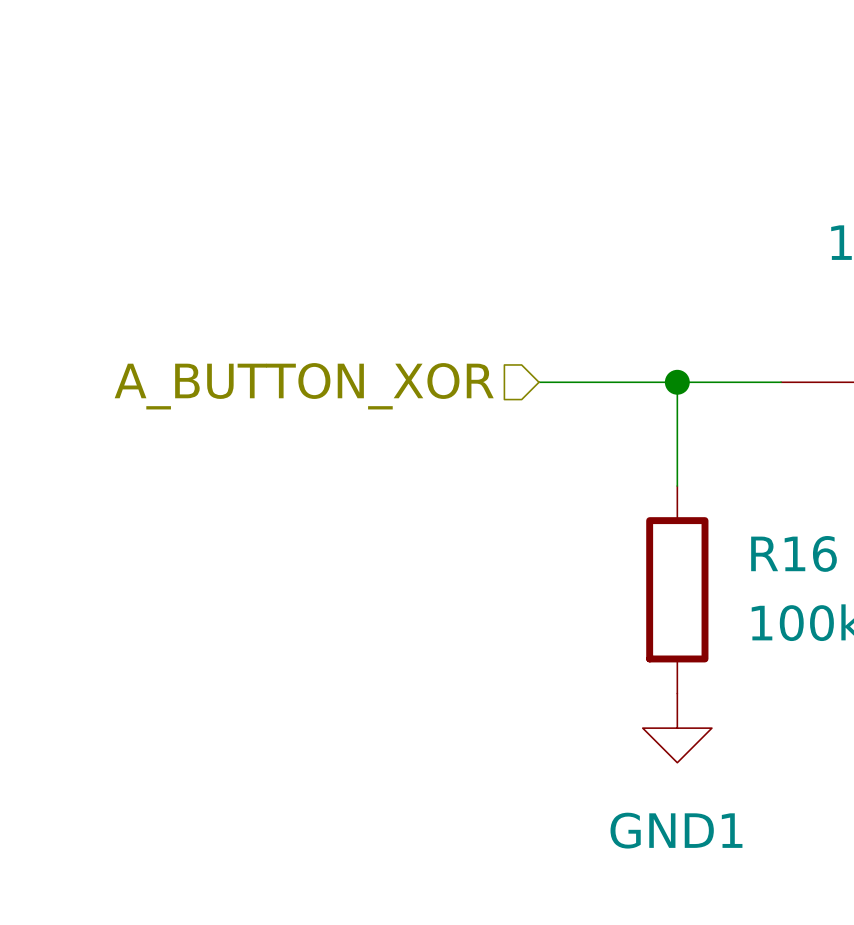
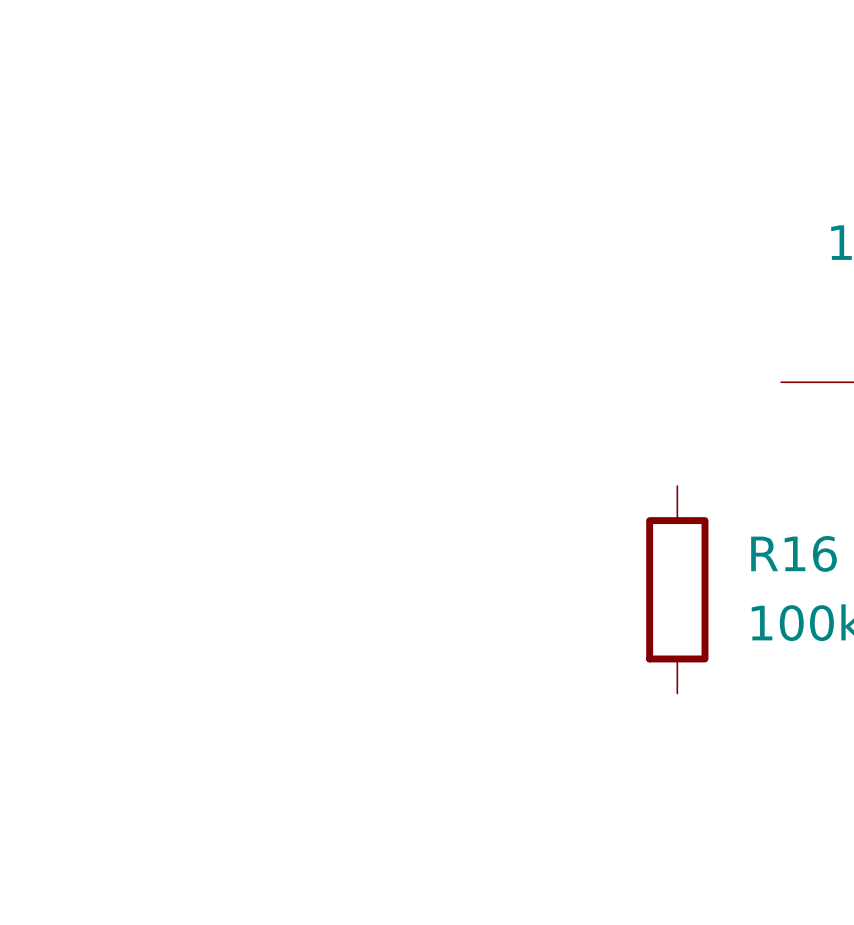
wire: (538, 382) (781, 382) -> none
wire: (677, 382) (677, 486) -> none
junction: (677, 382) -> none
hierarchical label: A_BUTTON_XOR (304, 386) -> none
power symbol: GND1 (677, 728) -> none

